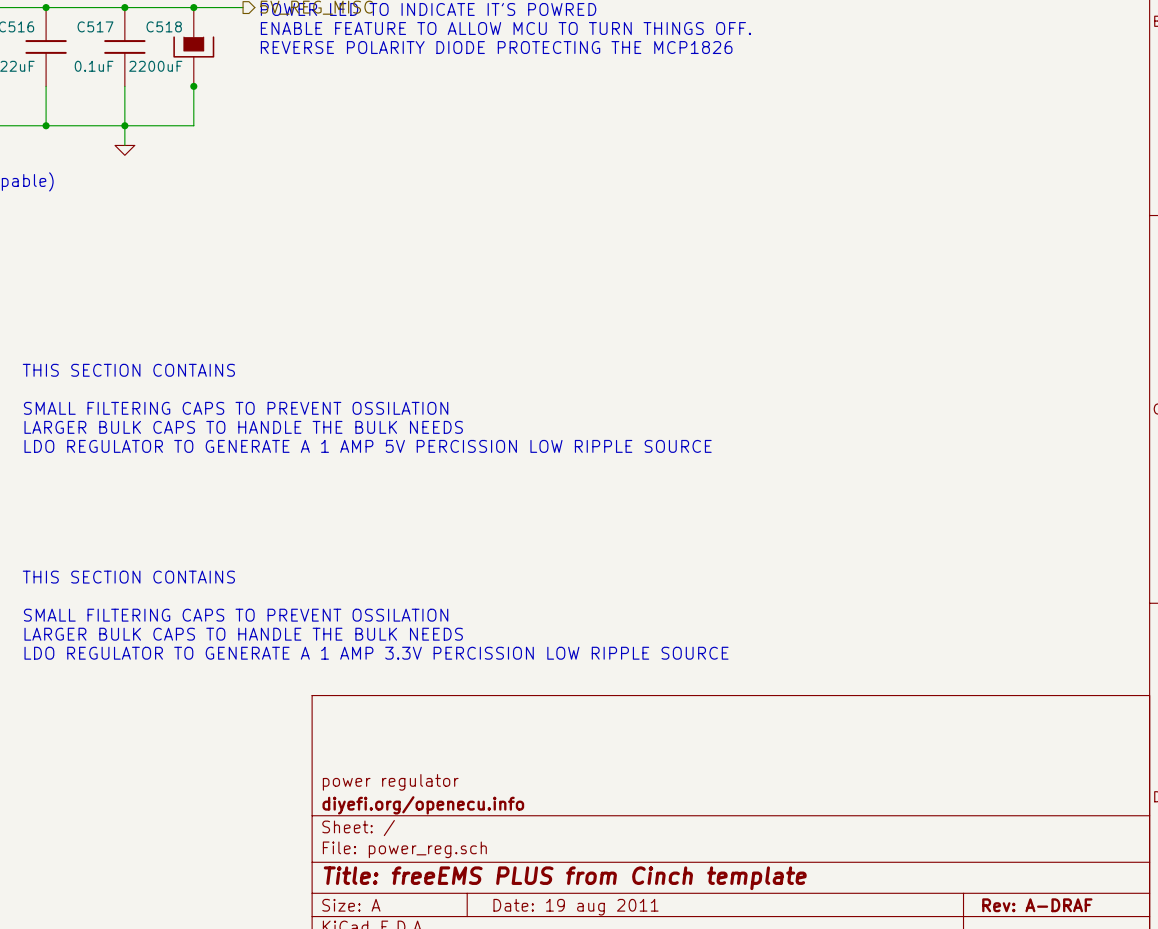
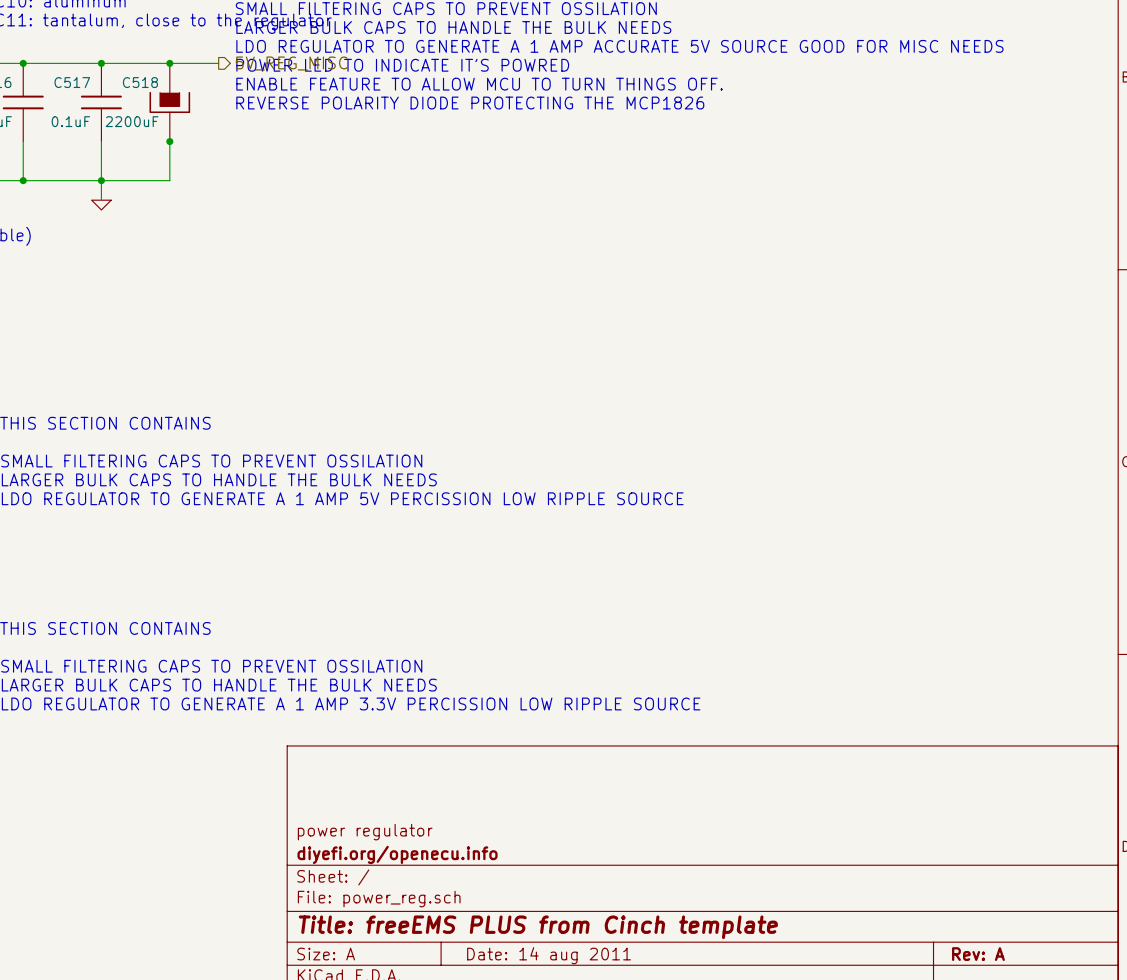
title block: Rev: A-DRAF (1037, 905) -> Rev: A (978, 954)
title block: Date: 19 aug 2011 (575, 907) -> Date: 14 aug 2011 (549, 955)

